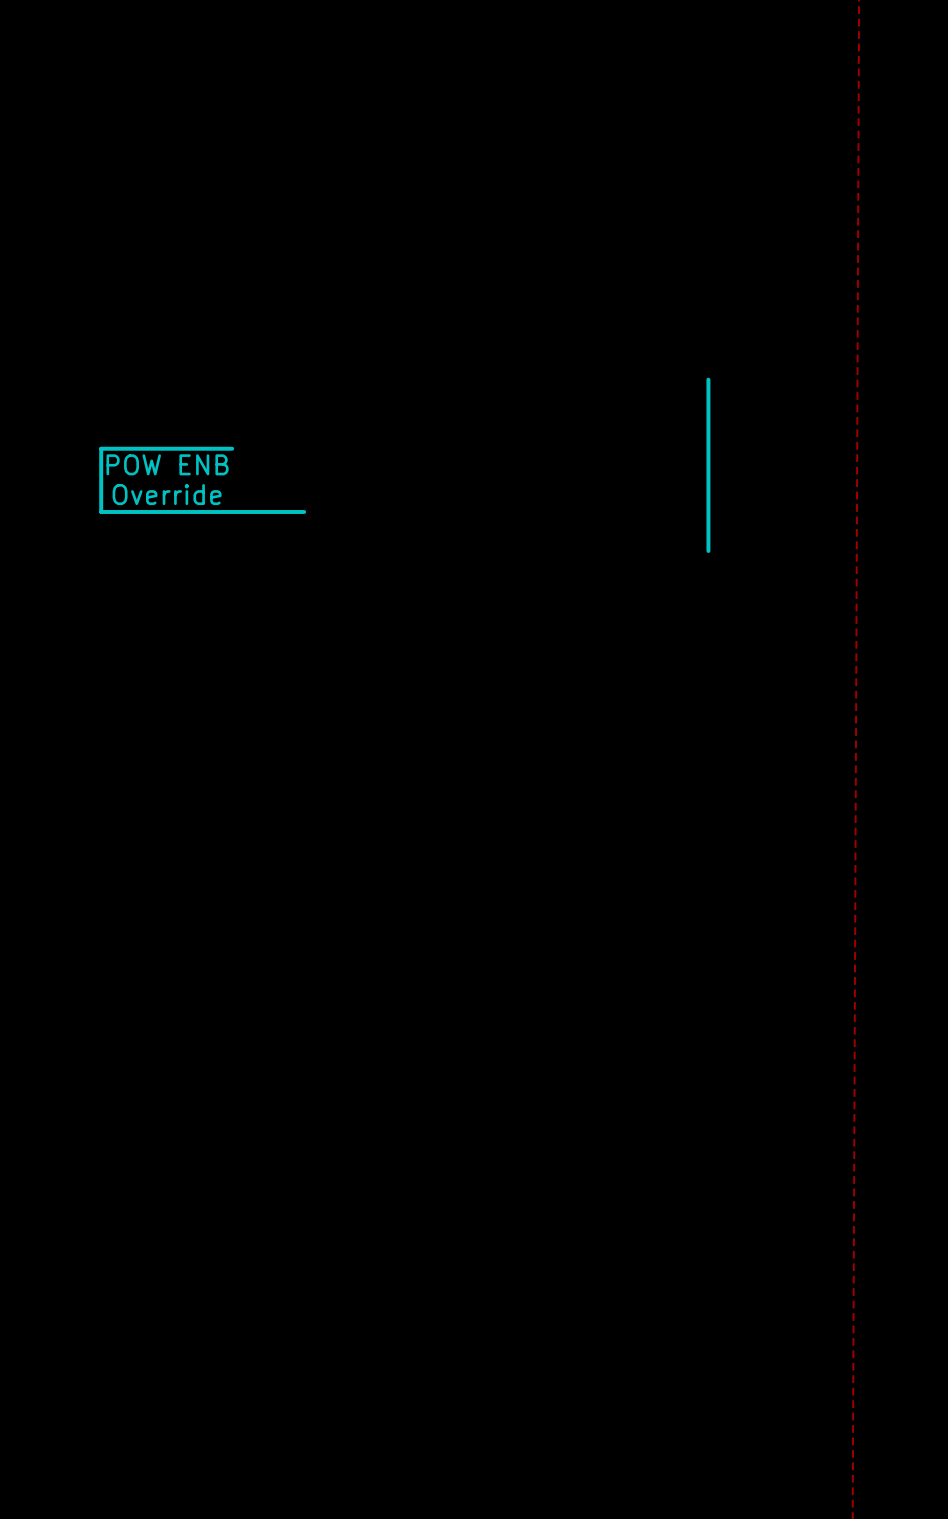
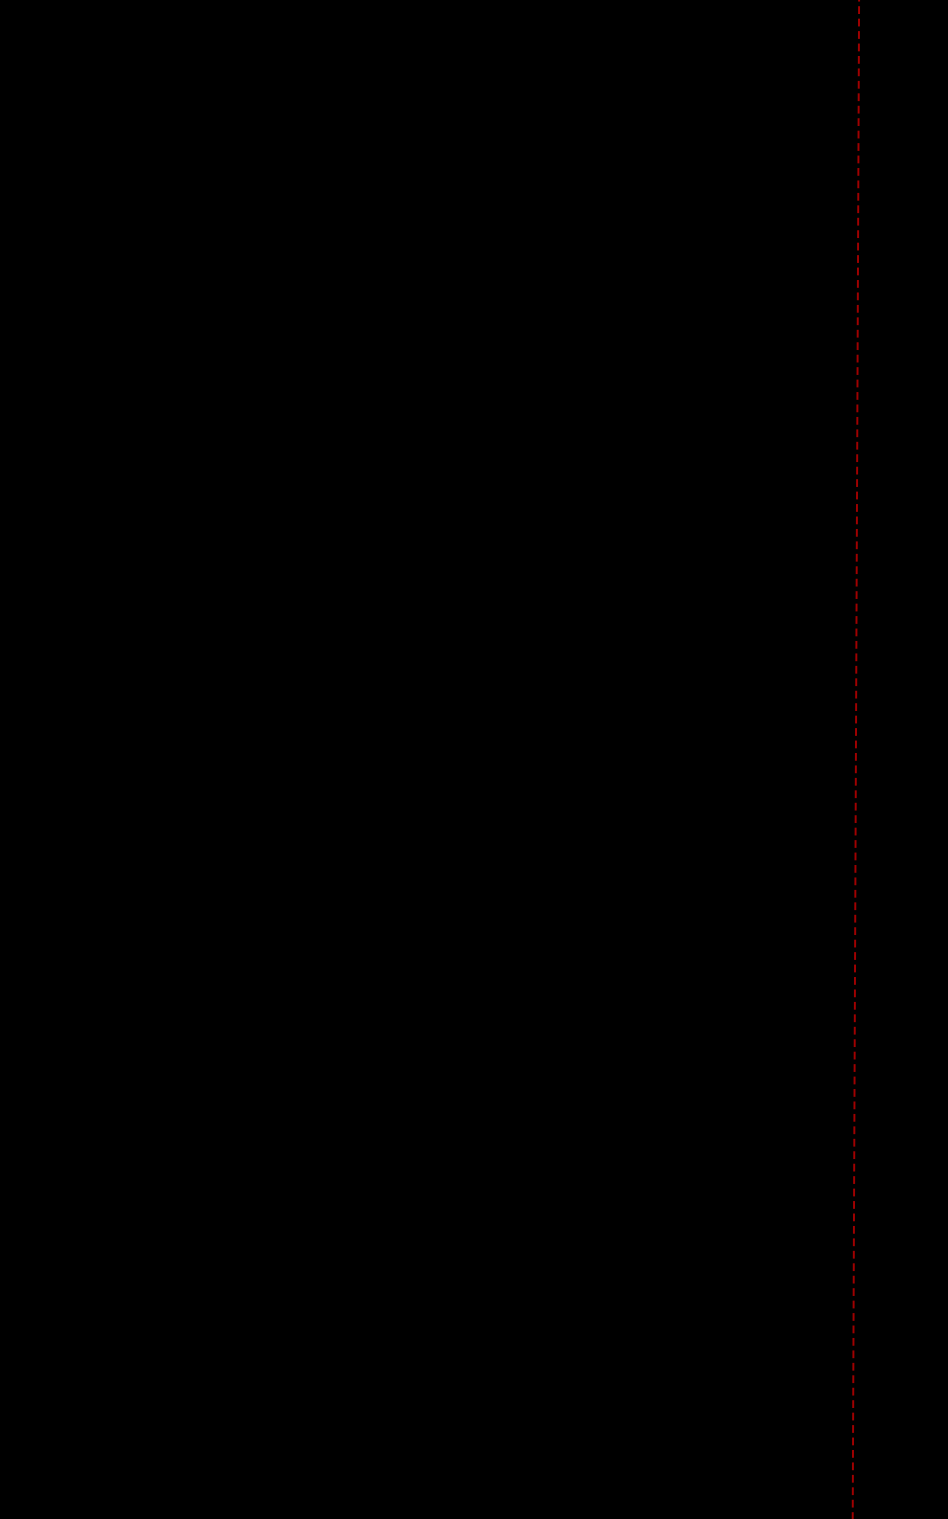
line: (708, 379) (708, 550) -> none
line: (232, 448) (101, 448) (101, 511) (304, 511) -> none
text: POW ENB (167, 464) -> none
text: Override (167, 494) -> none

